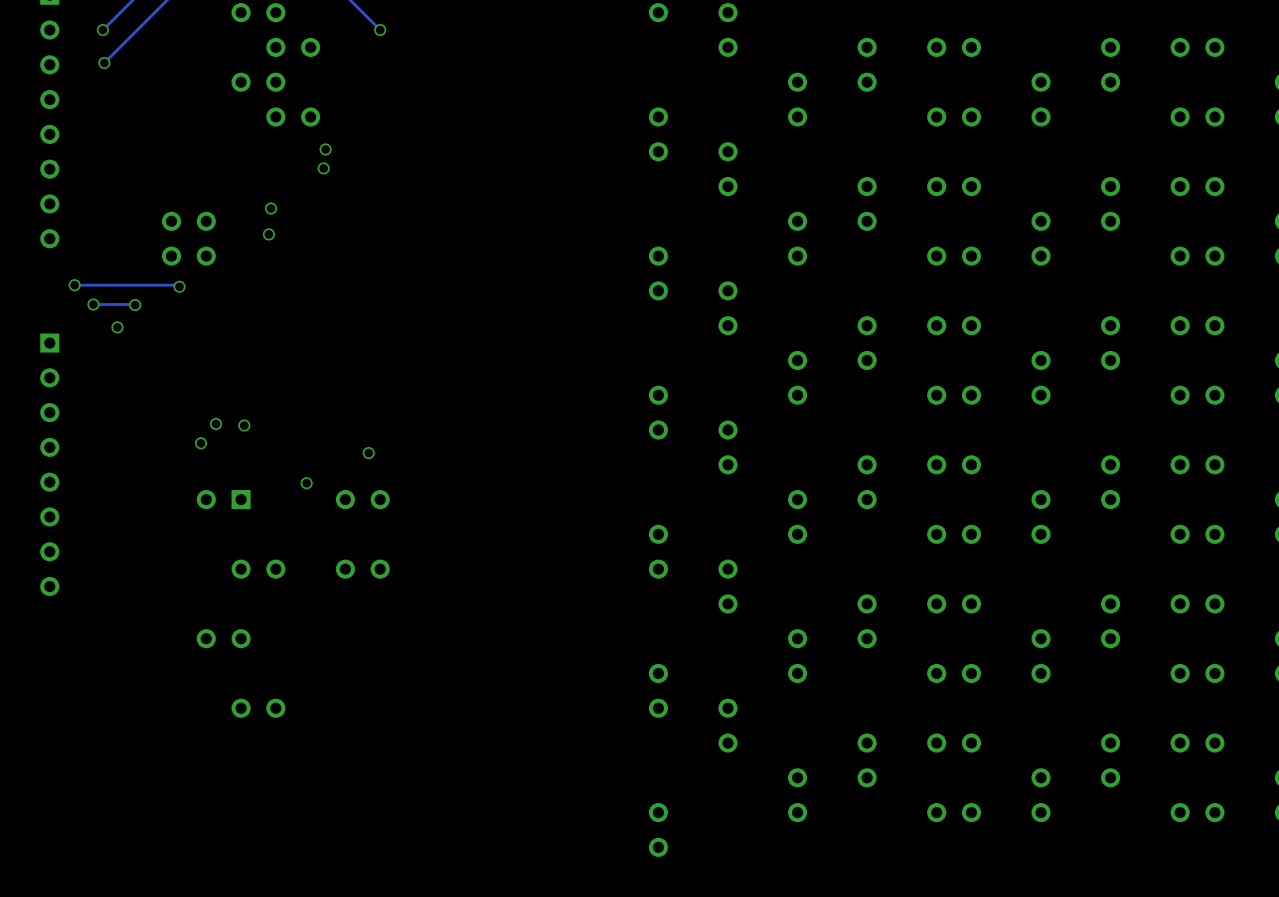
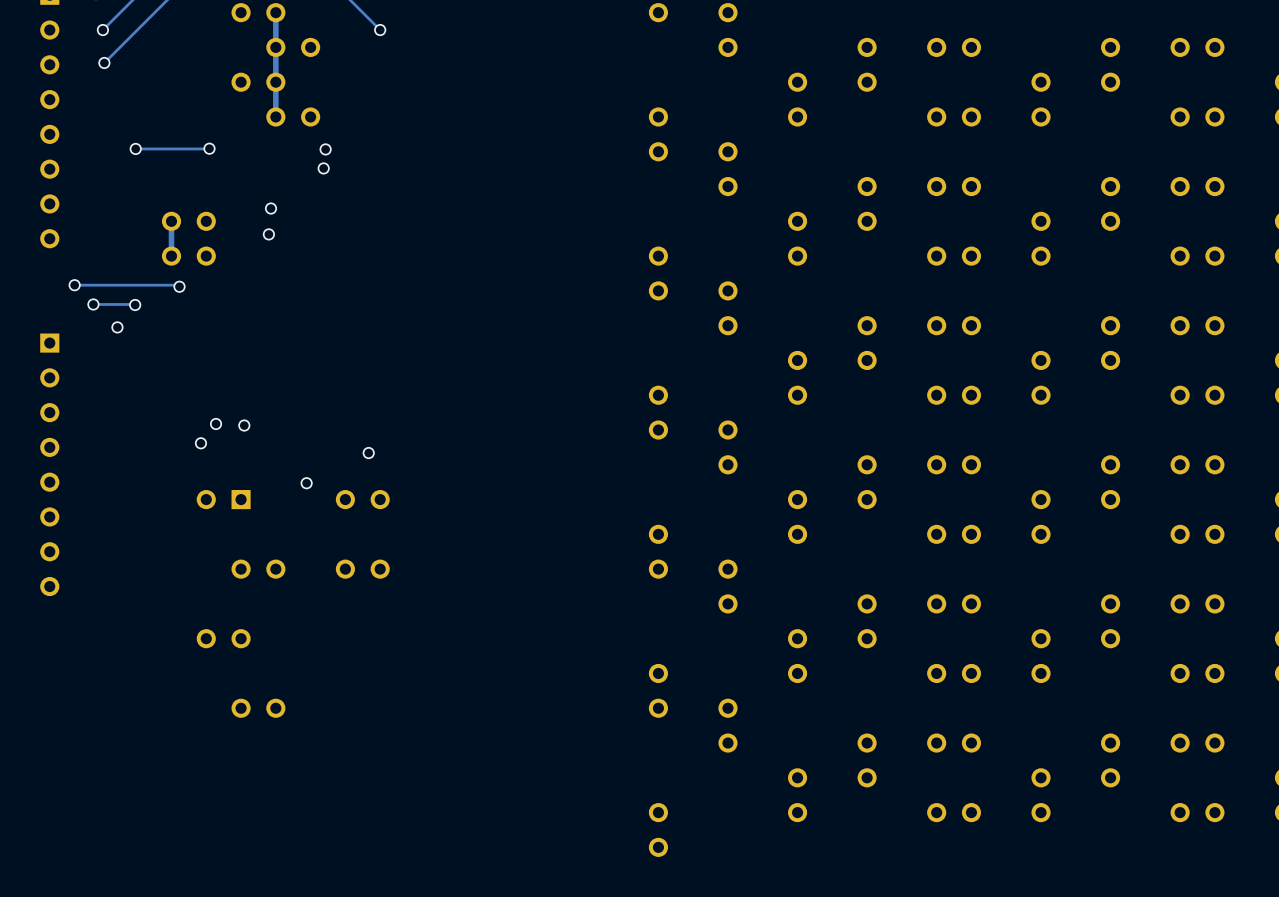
track: none -> (275, 12) (275, 116)
via: none -> (135, 148)
track: none -> (209, 148) (135, 148)
via: none -> (209, 148)
track: none -> (171, 221) (171, 256)

